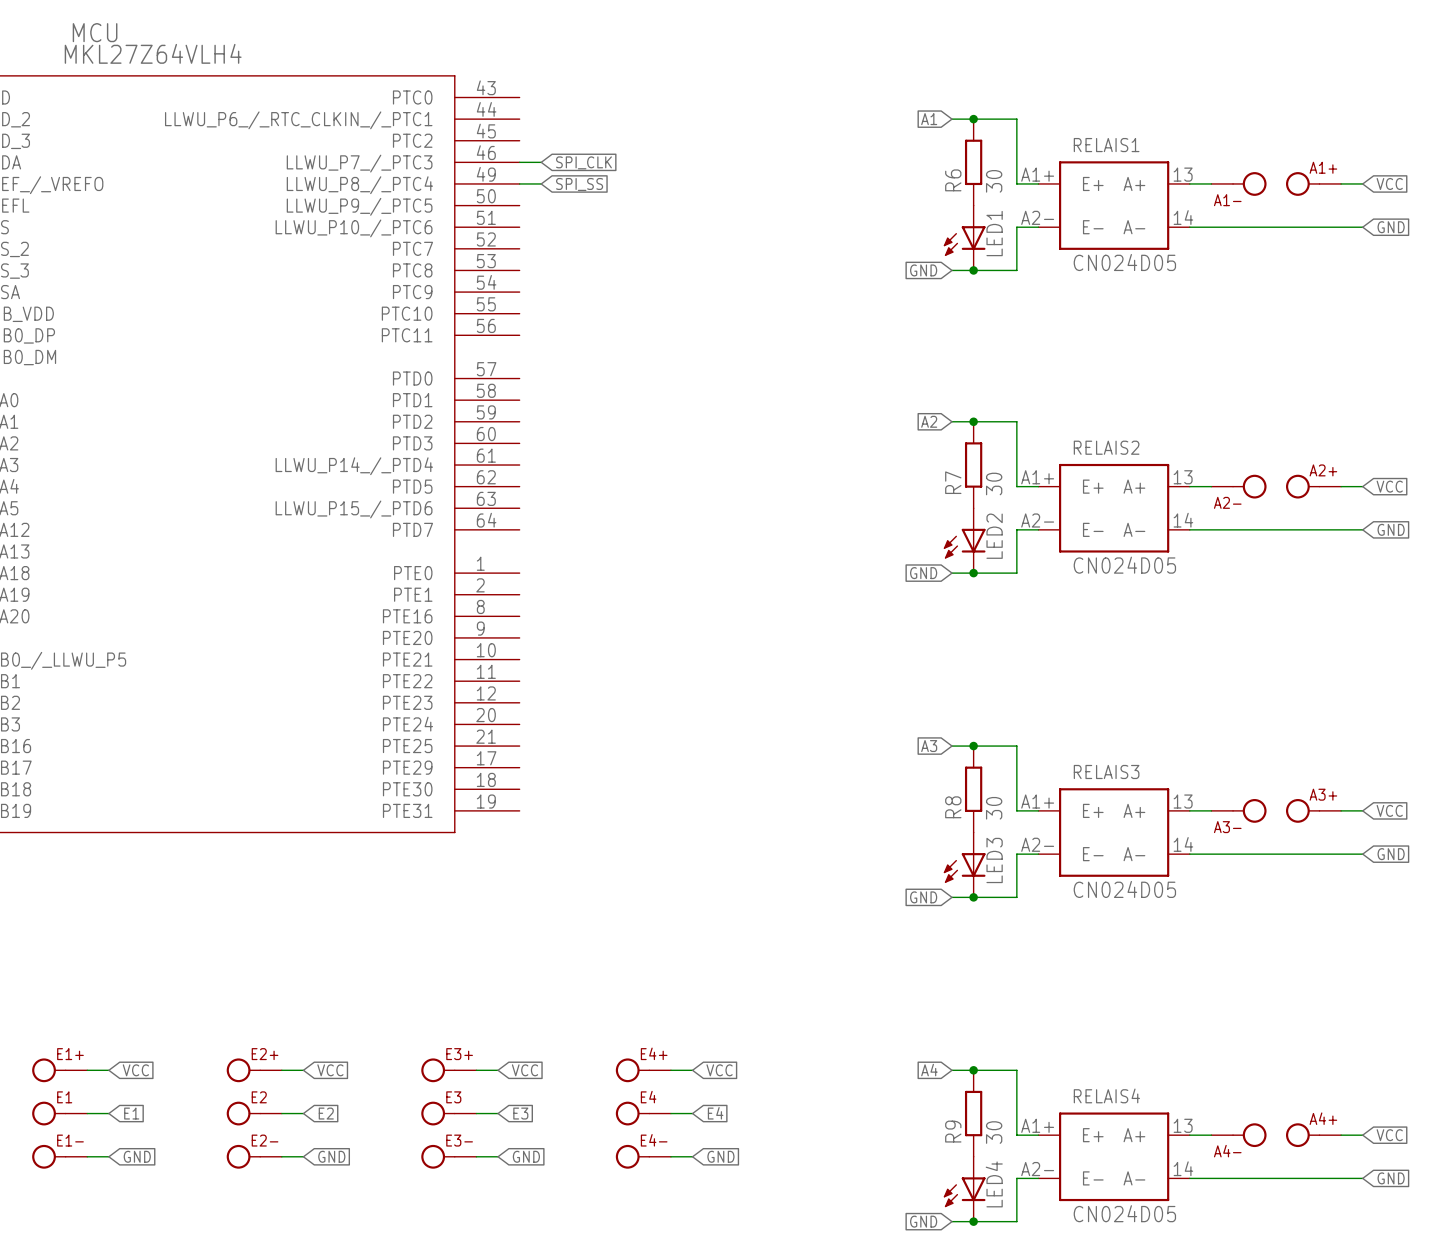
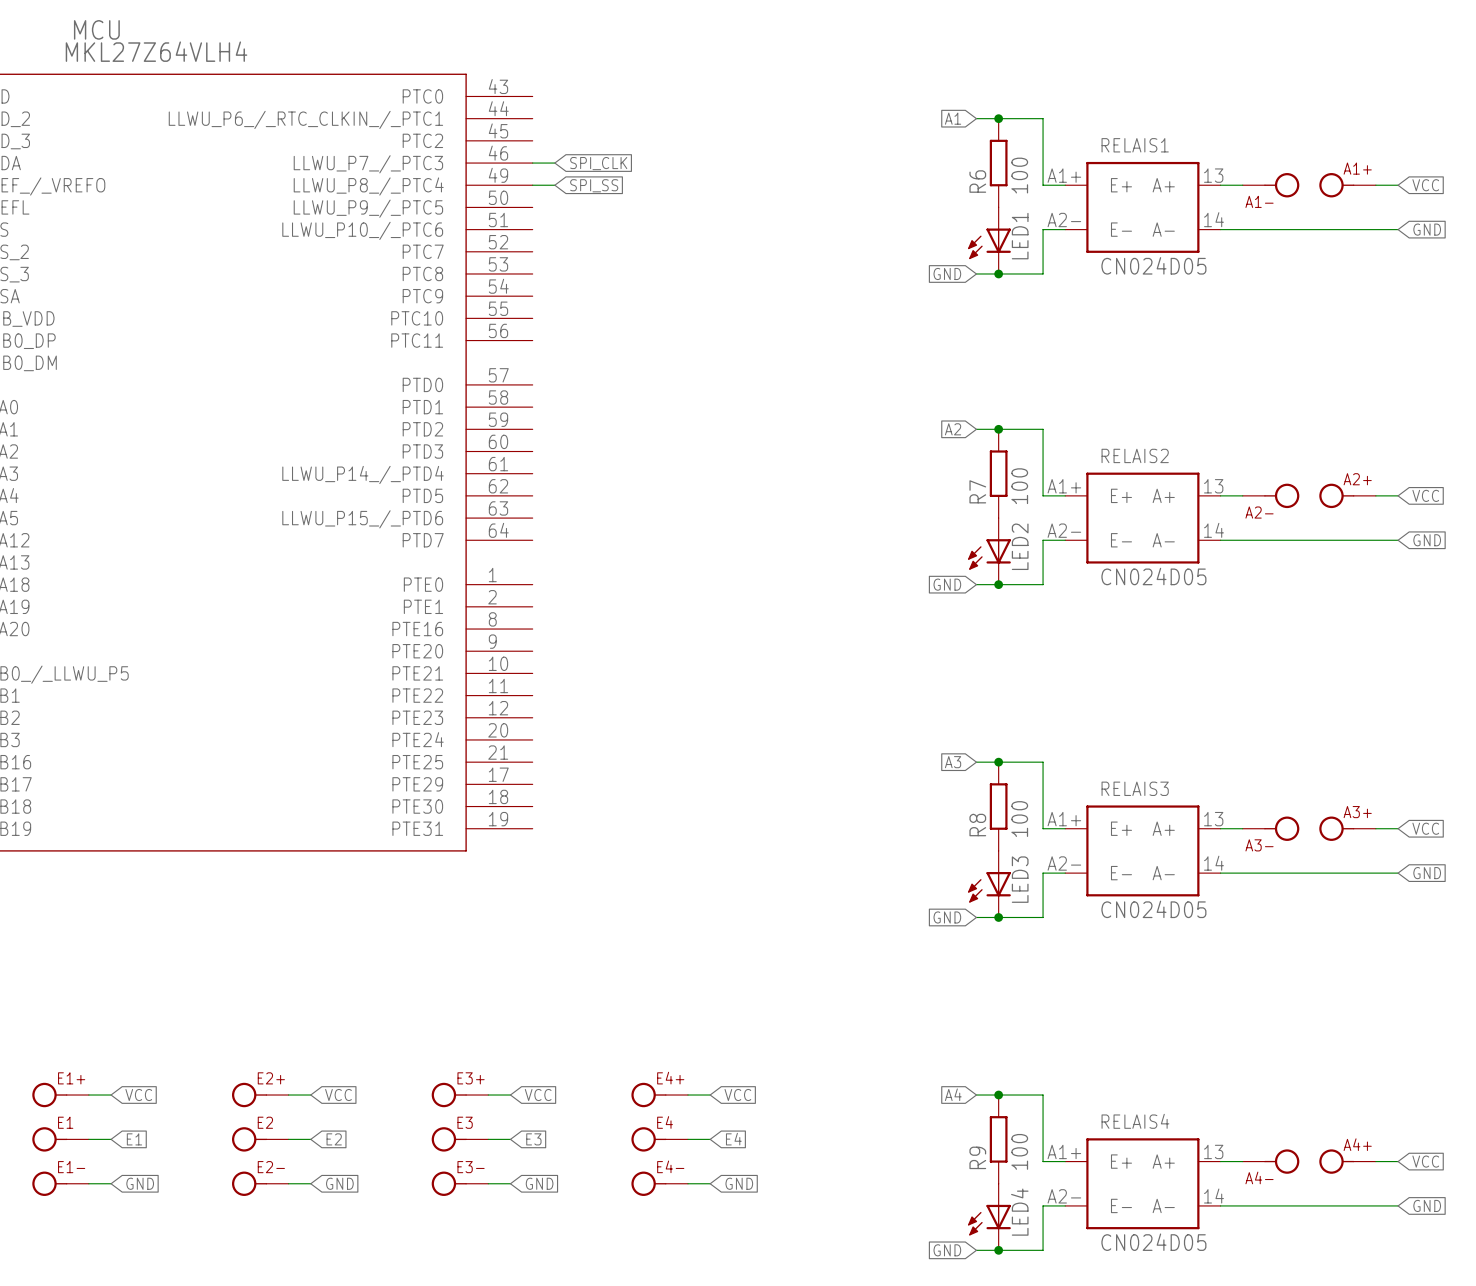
R6 value: 30 (994, 181) -> 100 (1019, 175)
R7 value: 30 (994, 483) -> 100 (1019, 486)
R8 value: 30 (994, 808) -> 100 (1019, 819)
R9 value: 30 (994, 1132) -> 100 (1019, 1151)

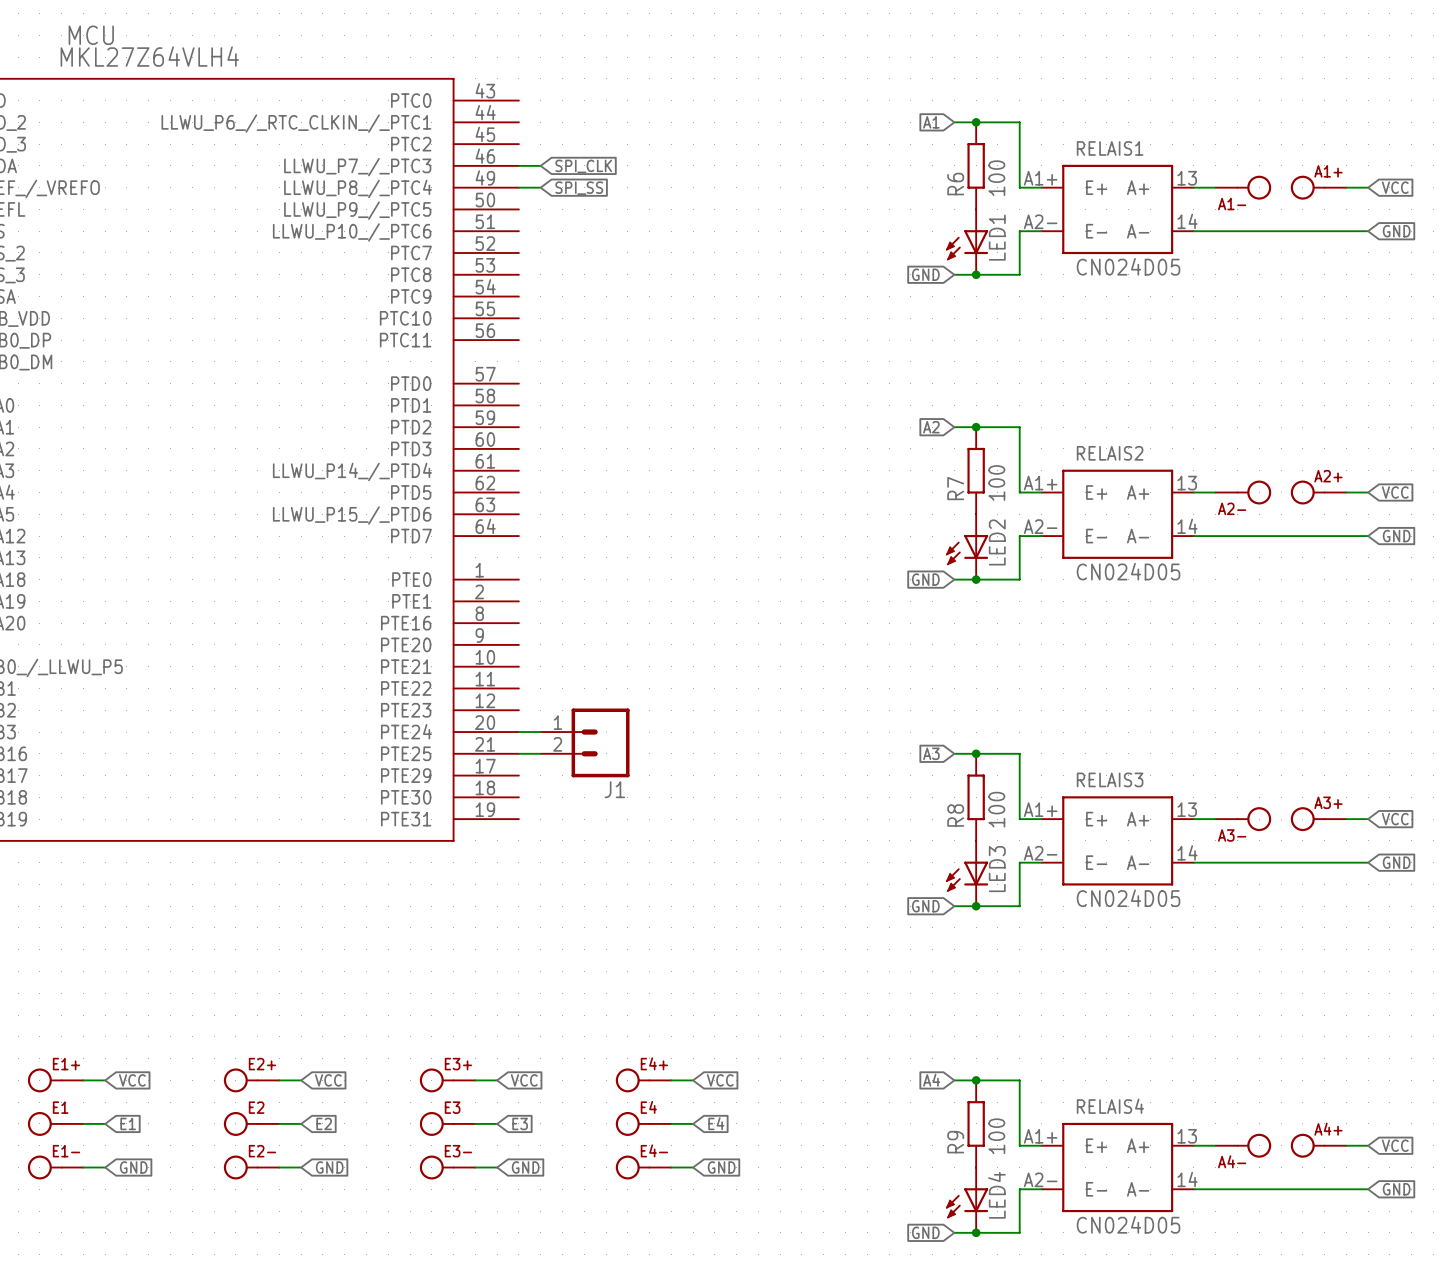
wire: none -> (518, 732) (540, 732)
J1: none -> (585, 742)
wire: none -> (518, 753) (540, 753)

